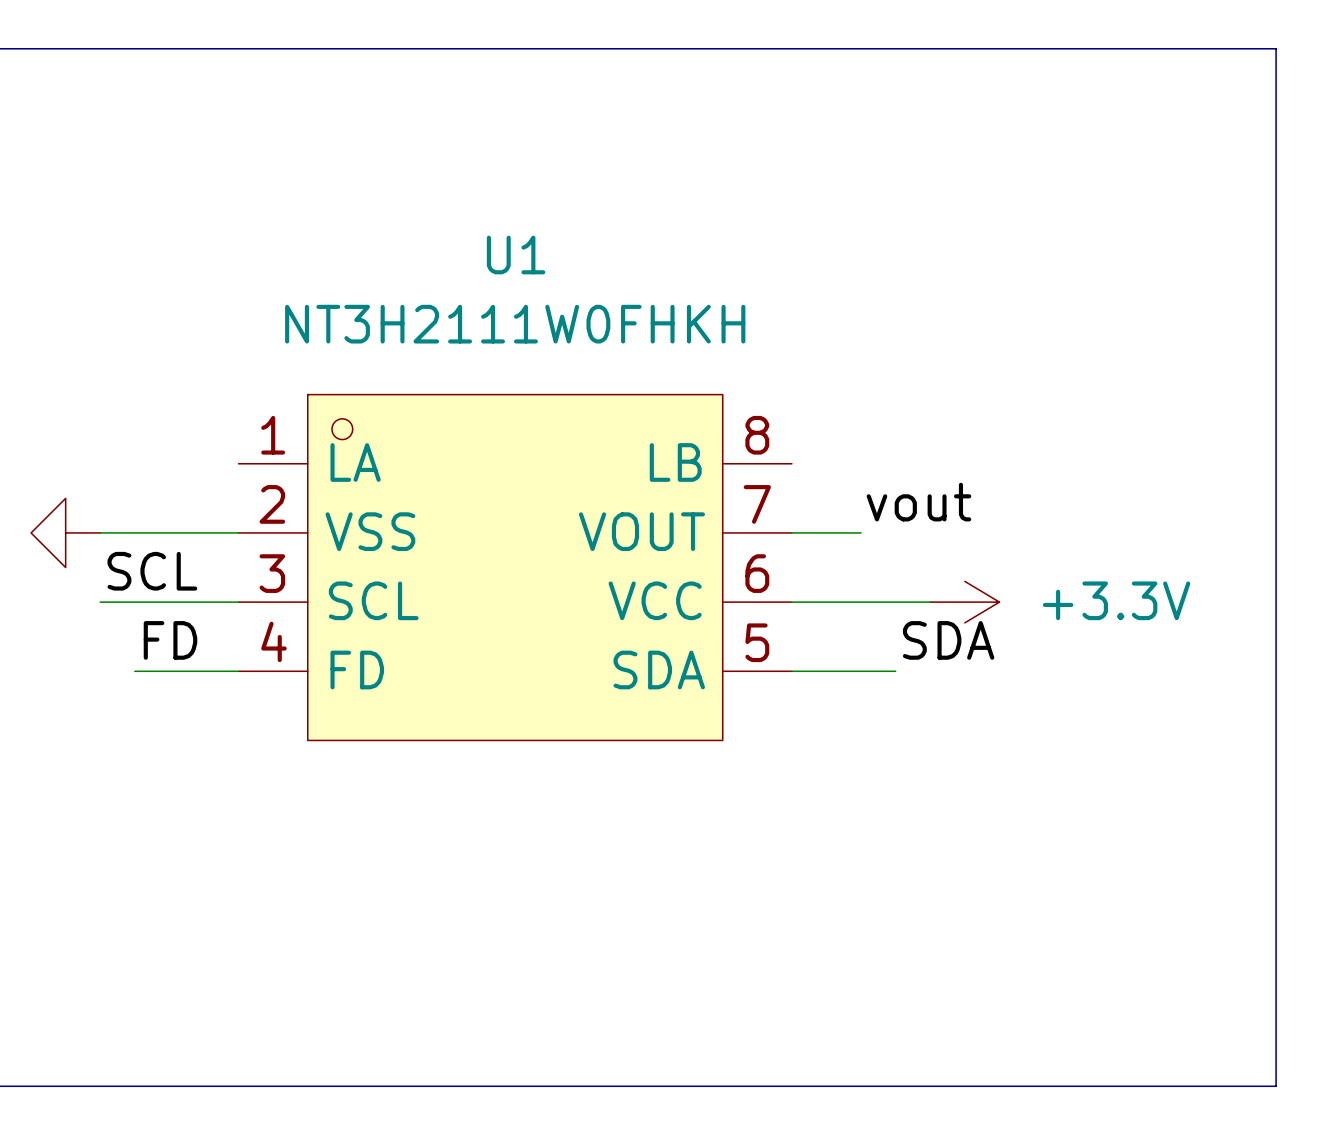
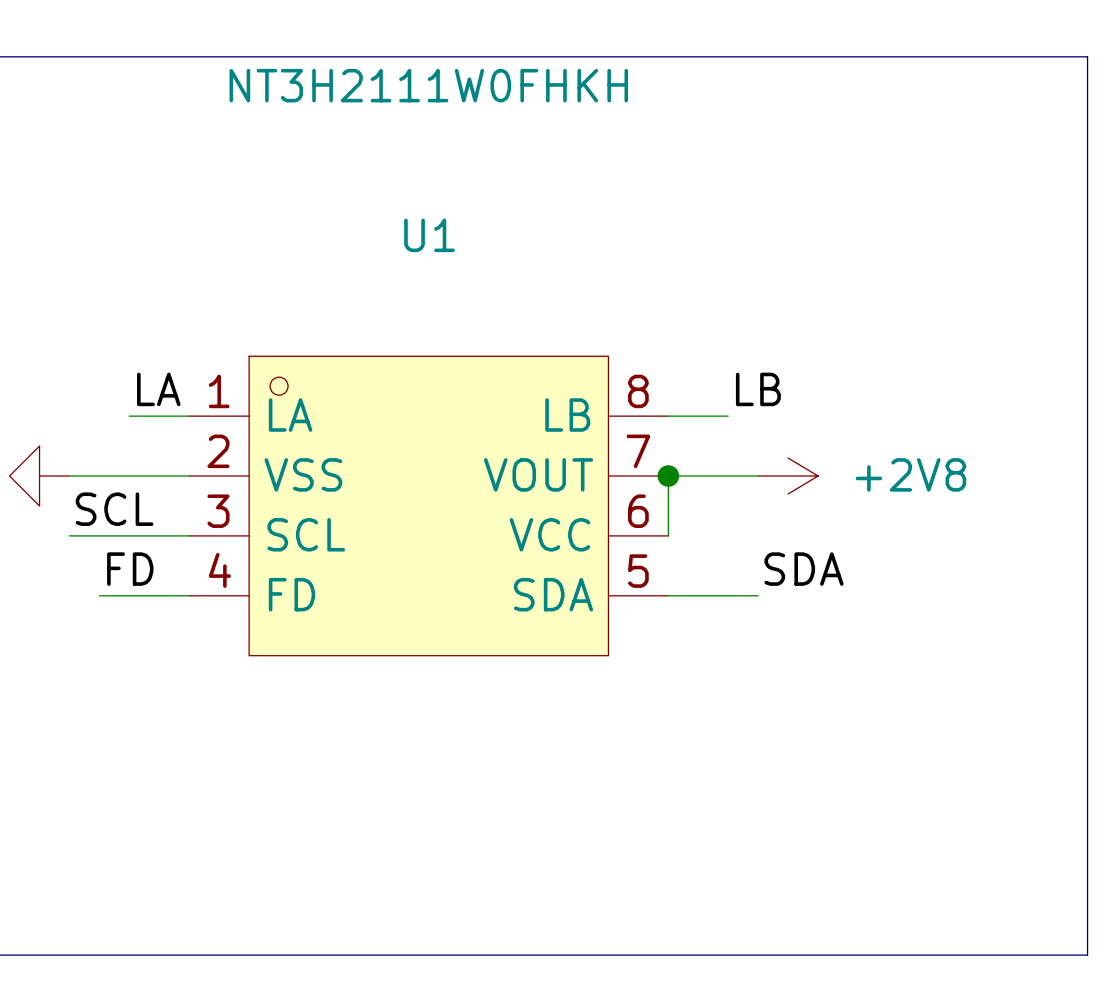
U1 value position: NT3H2111W0FHKH (515, 324) -> NT3H2111W0FHKH (428, 85)
label: none -> LA (158, 389)
label: none -> LB (758, 389)
wire: none -> (129, 416) (189, 416)
wire: none -> (668, 416) (728, 416)
label: vout (918, 502) -> none
junction: none -> (668, 476)
wire: none -> (728, 476) (758, 476)
power symbol: none -> +2V8 (788, 476)
wire: (791, 602) (930, 602) -> (668, 535) (668, 476)
power symbol: +3.3V (964, 602) -> none

